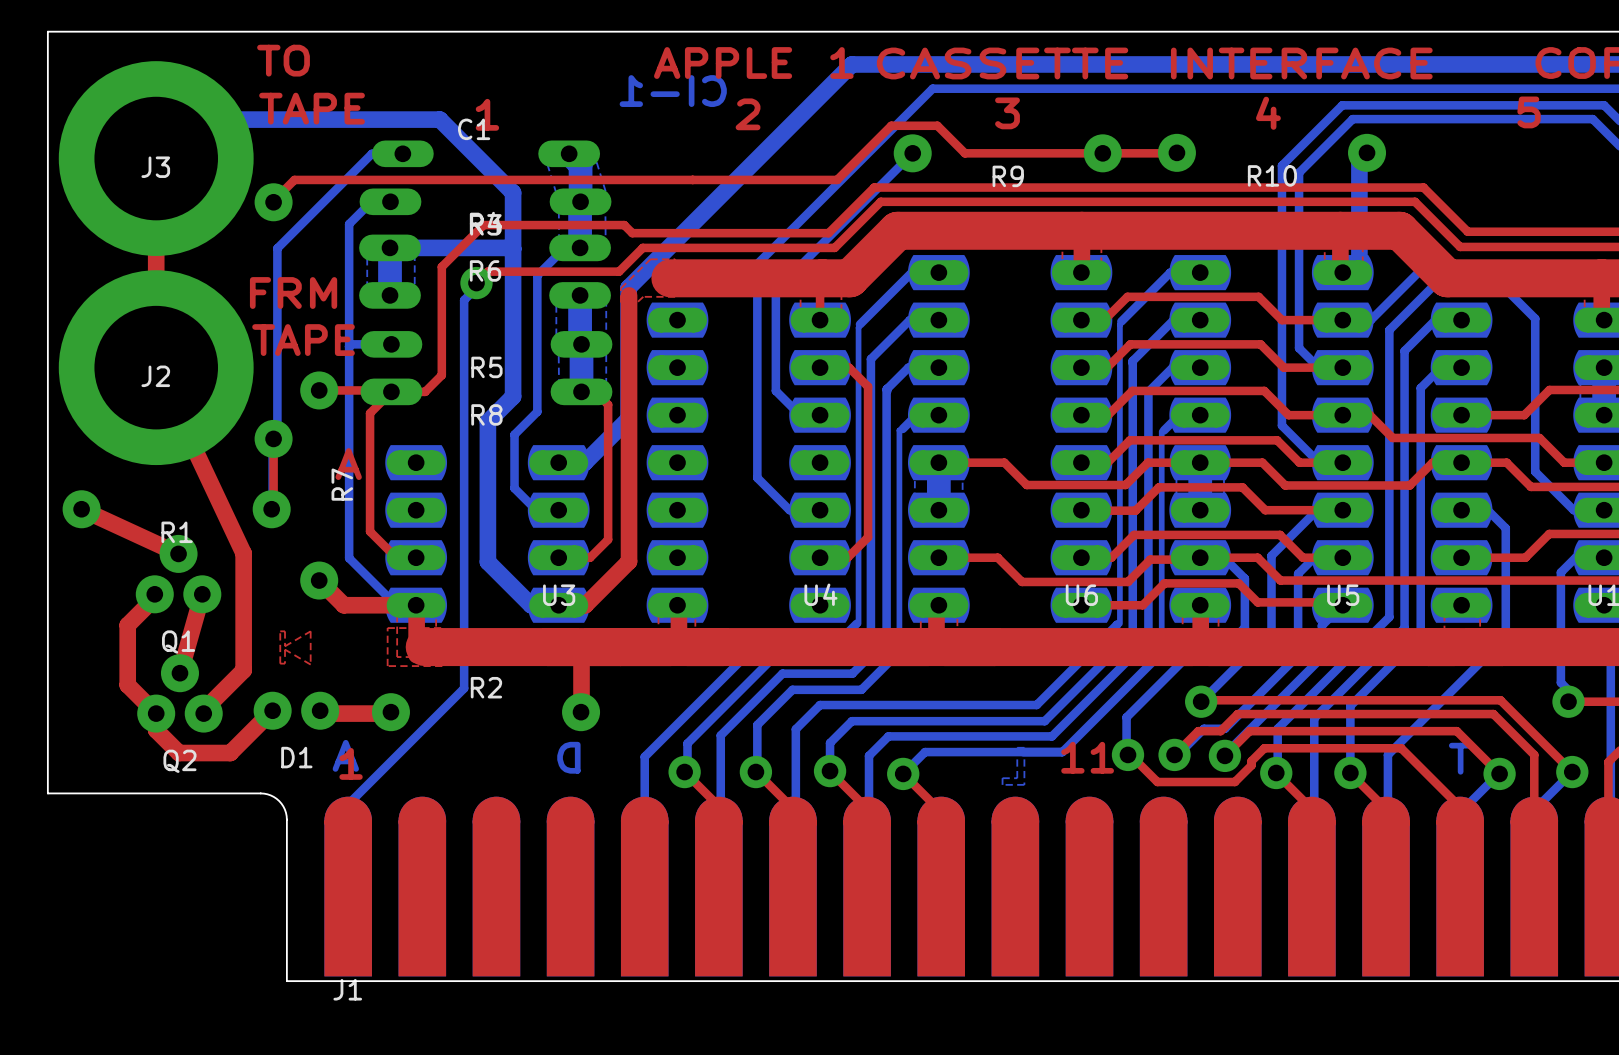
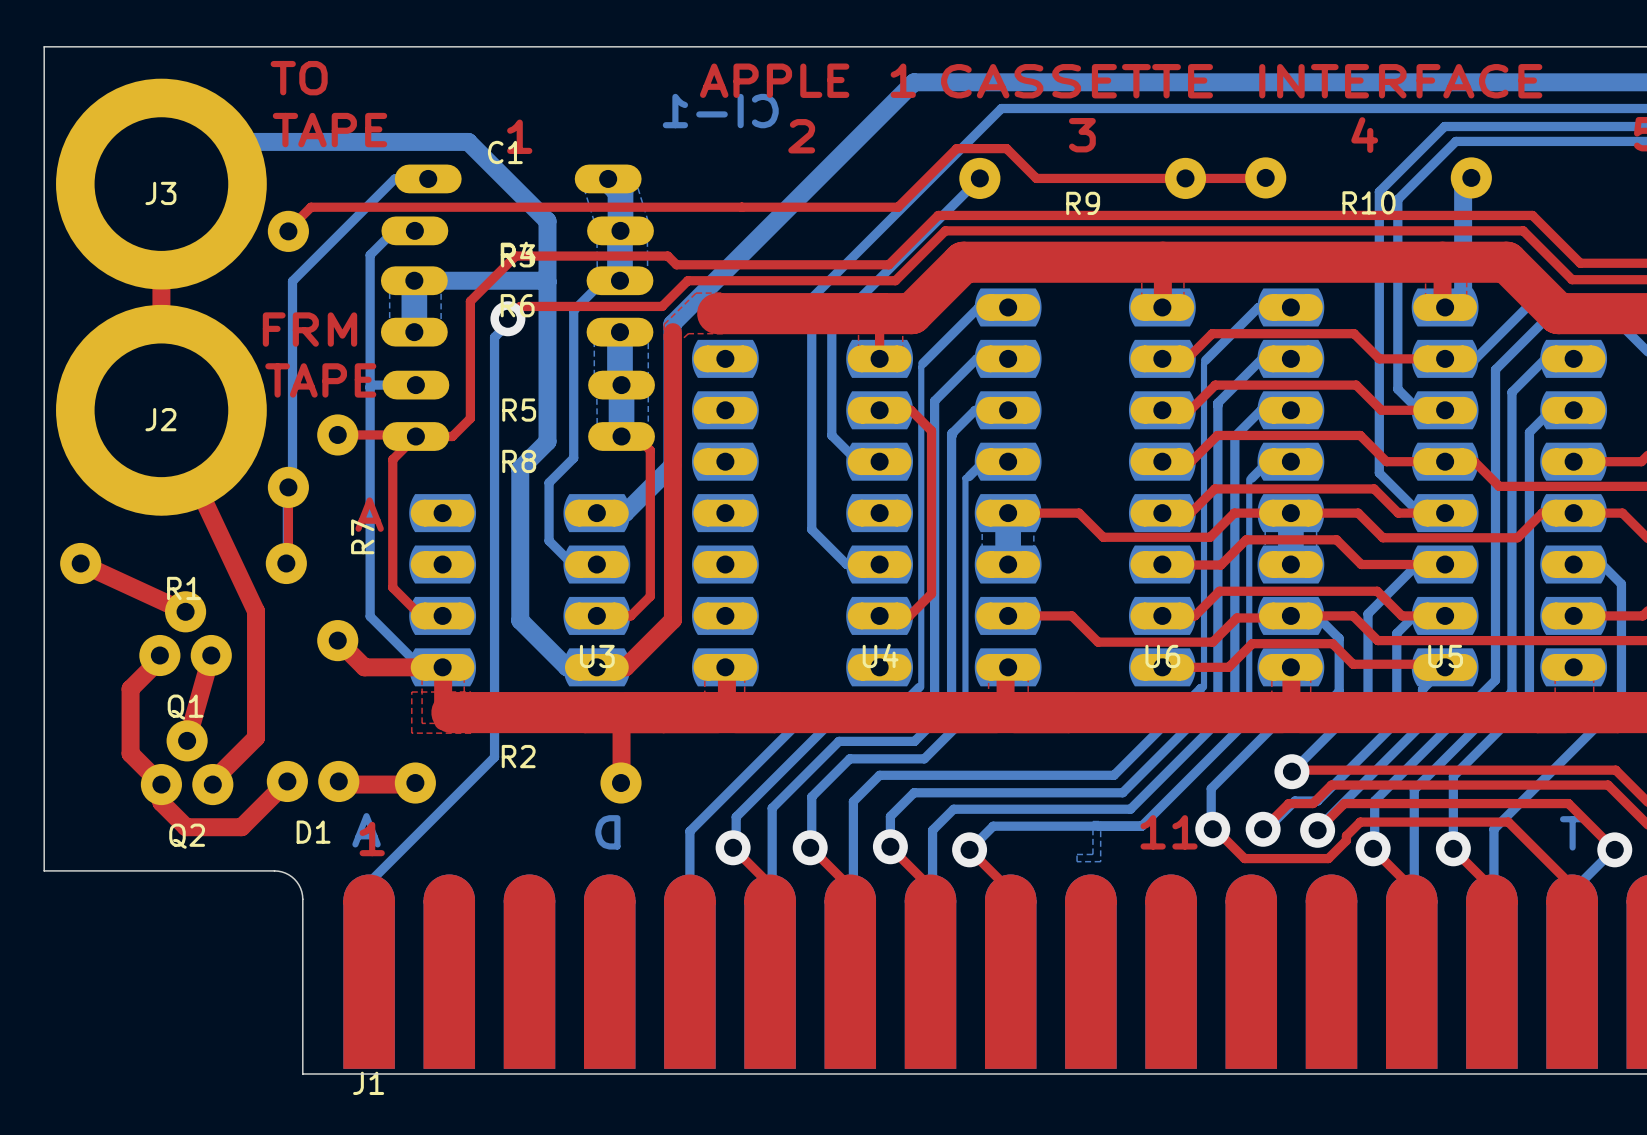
top zone outline: (280, 631) (280, 663) (285, 663) (285, 649) (310, 664) (310, 631) (285, 646) (285, 631) (280, 631) -> none

